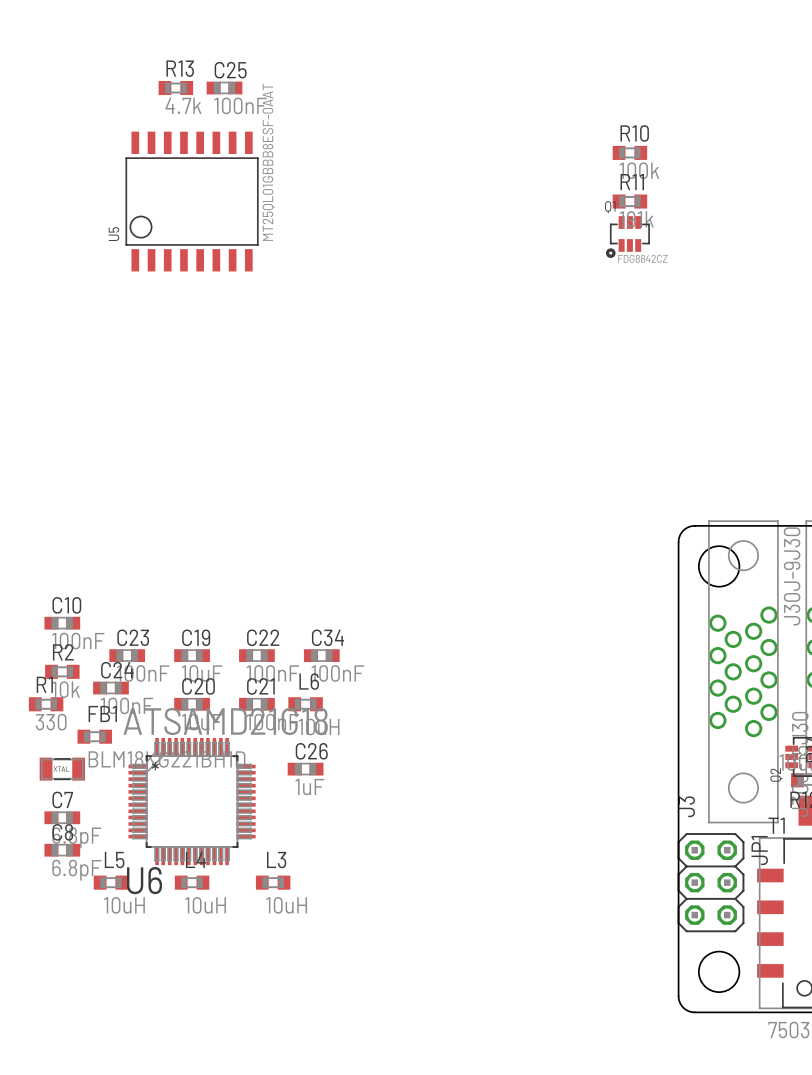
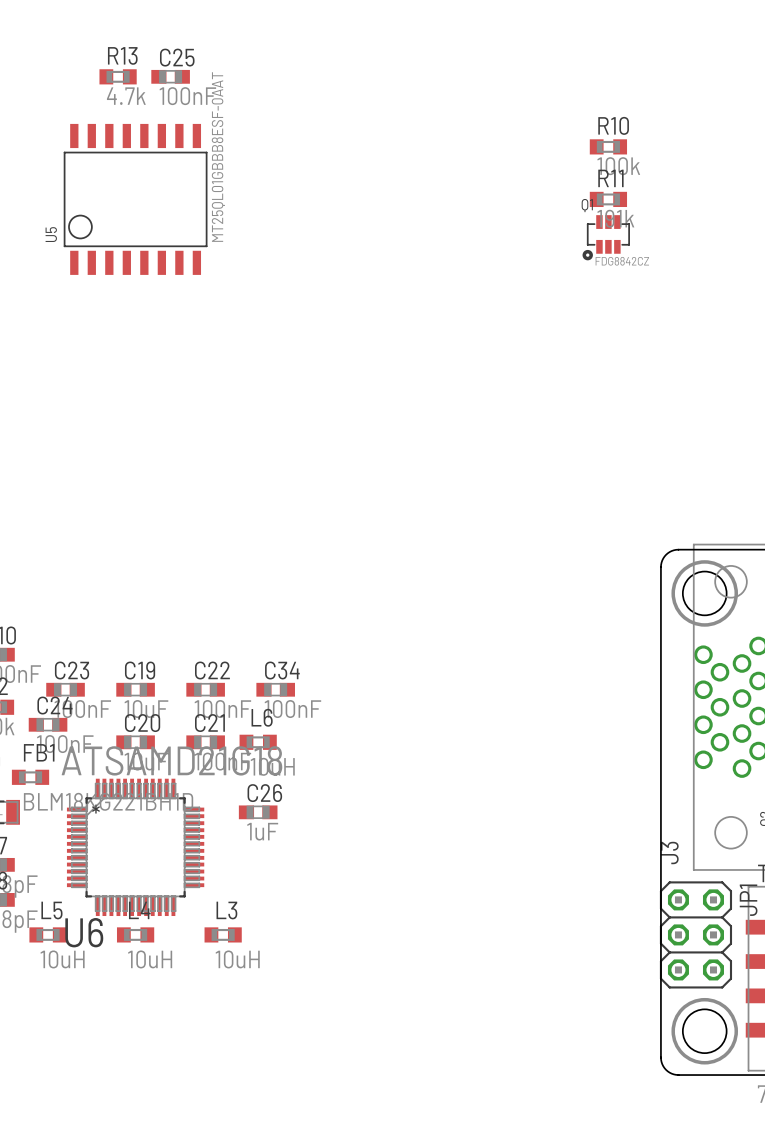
drawing: none -> [671, 560, 739, 627]
drawing: none -> [671, 997, 739, 1065]

